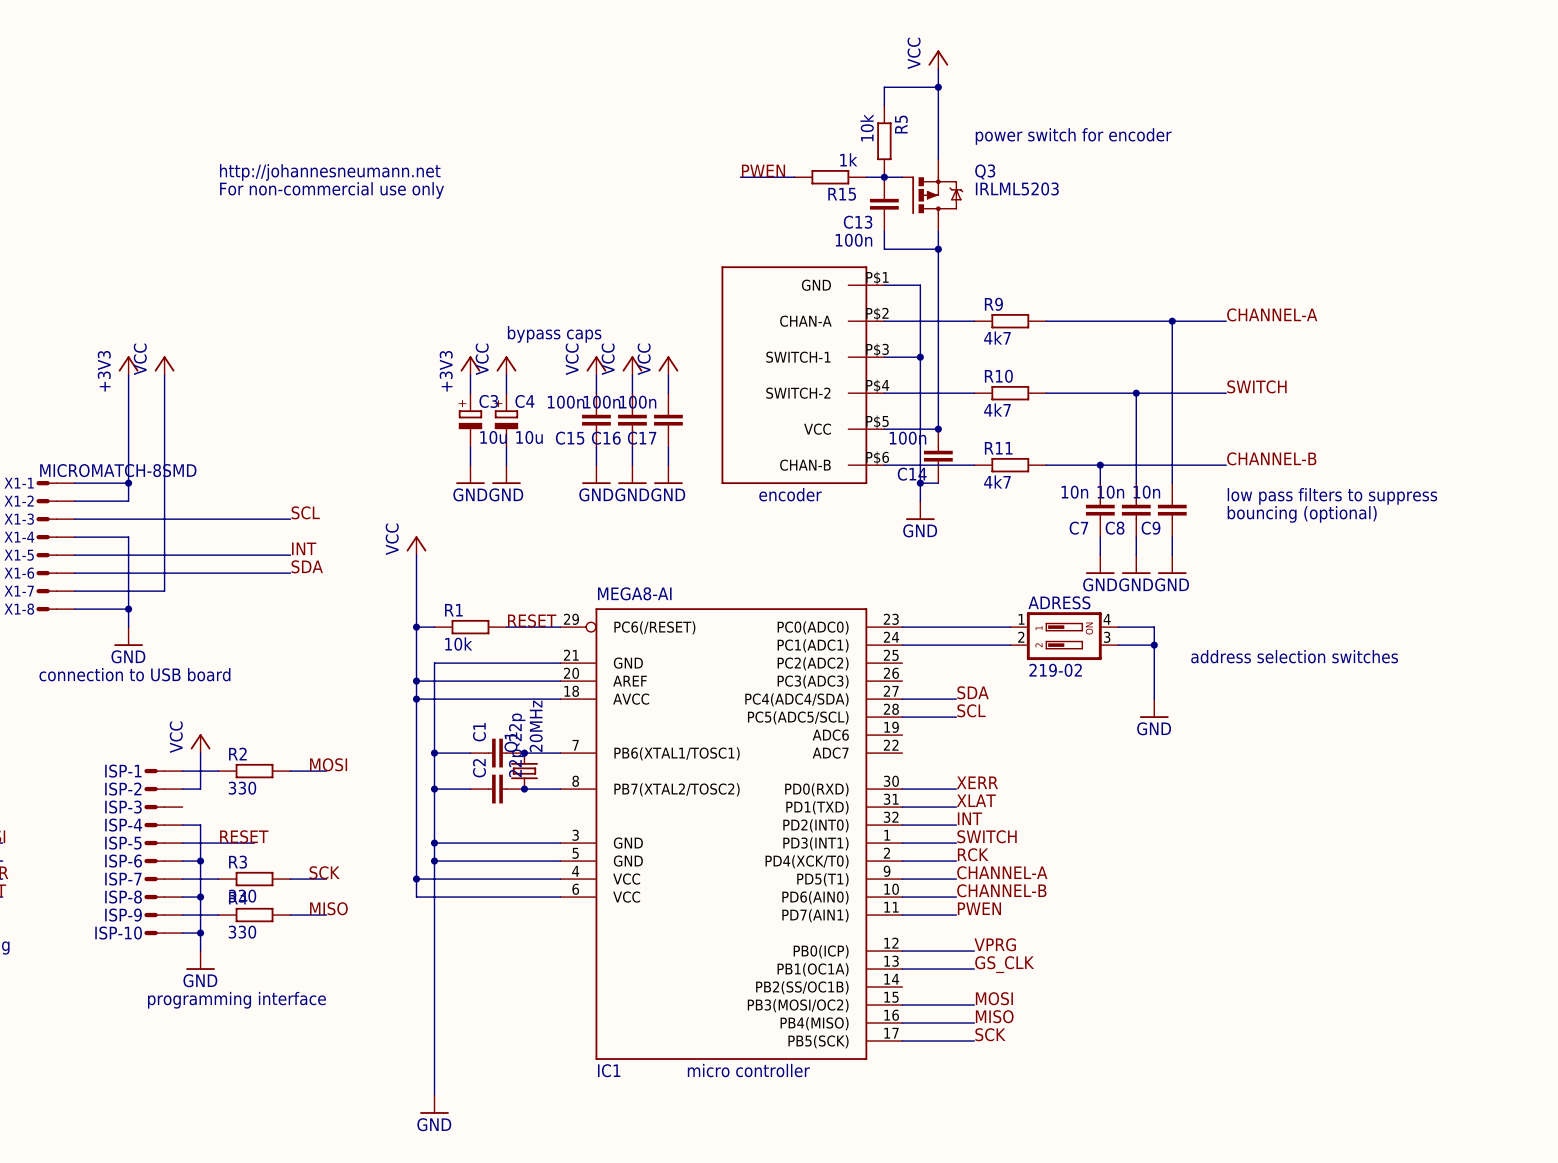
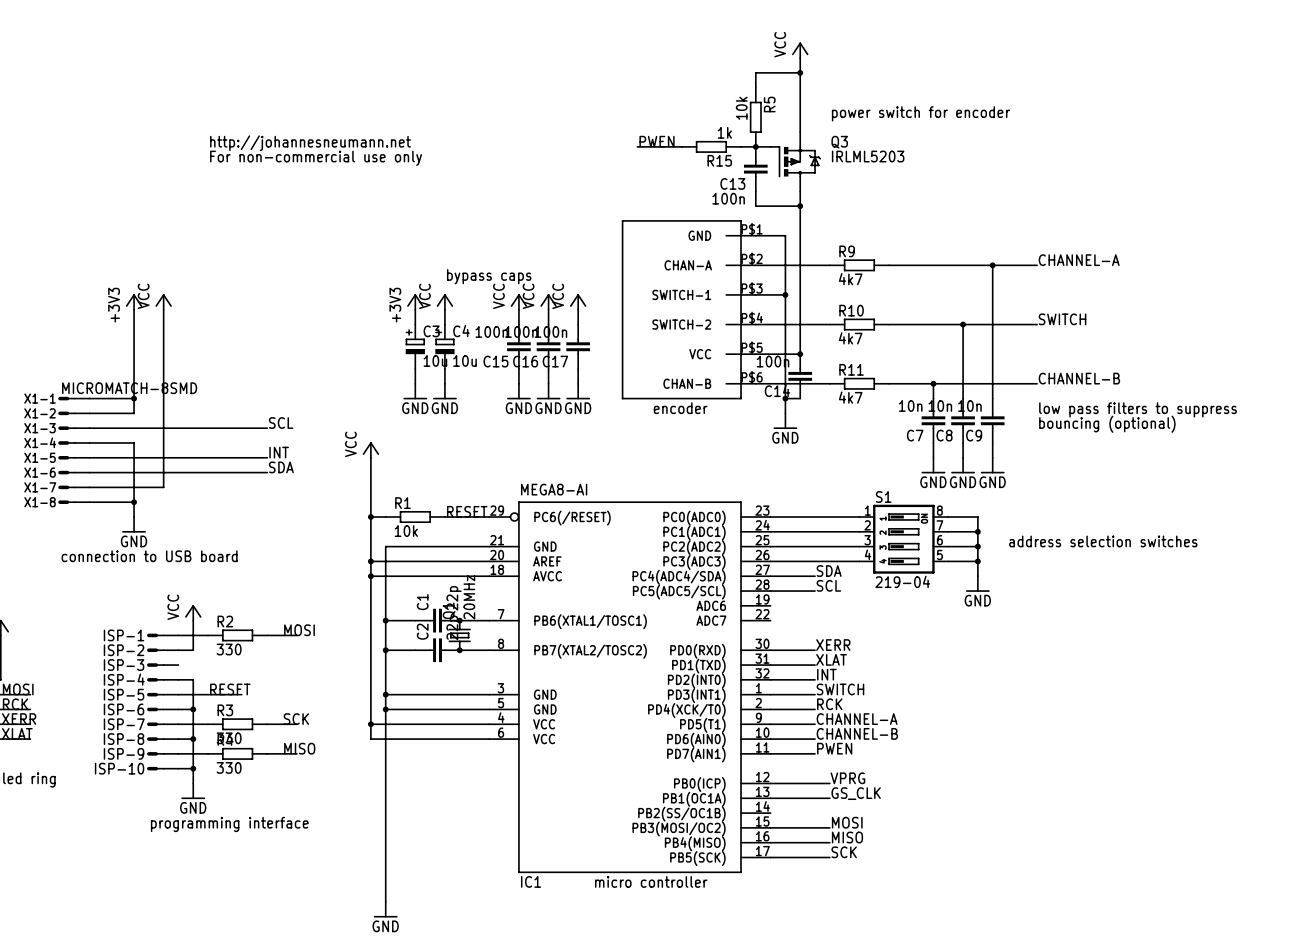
ADRESS: 219-02 (1064, 636) -> none
S1: none -> 219-04 (903, 539)
wire: none -> (770, 546) (859, 546)
wire: none -> (948, 546) (977, 546)
junction: none -> (977, 546)
wire: none -> (770, 561) (859, 561)
wire: none -> (948, 561) (977, 561)
junction: none -> (977, 561)

